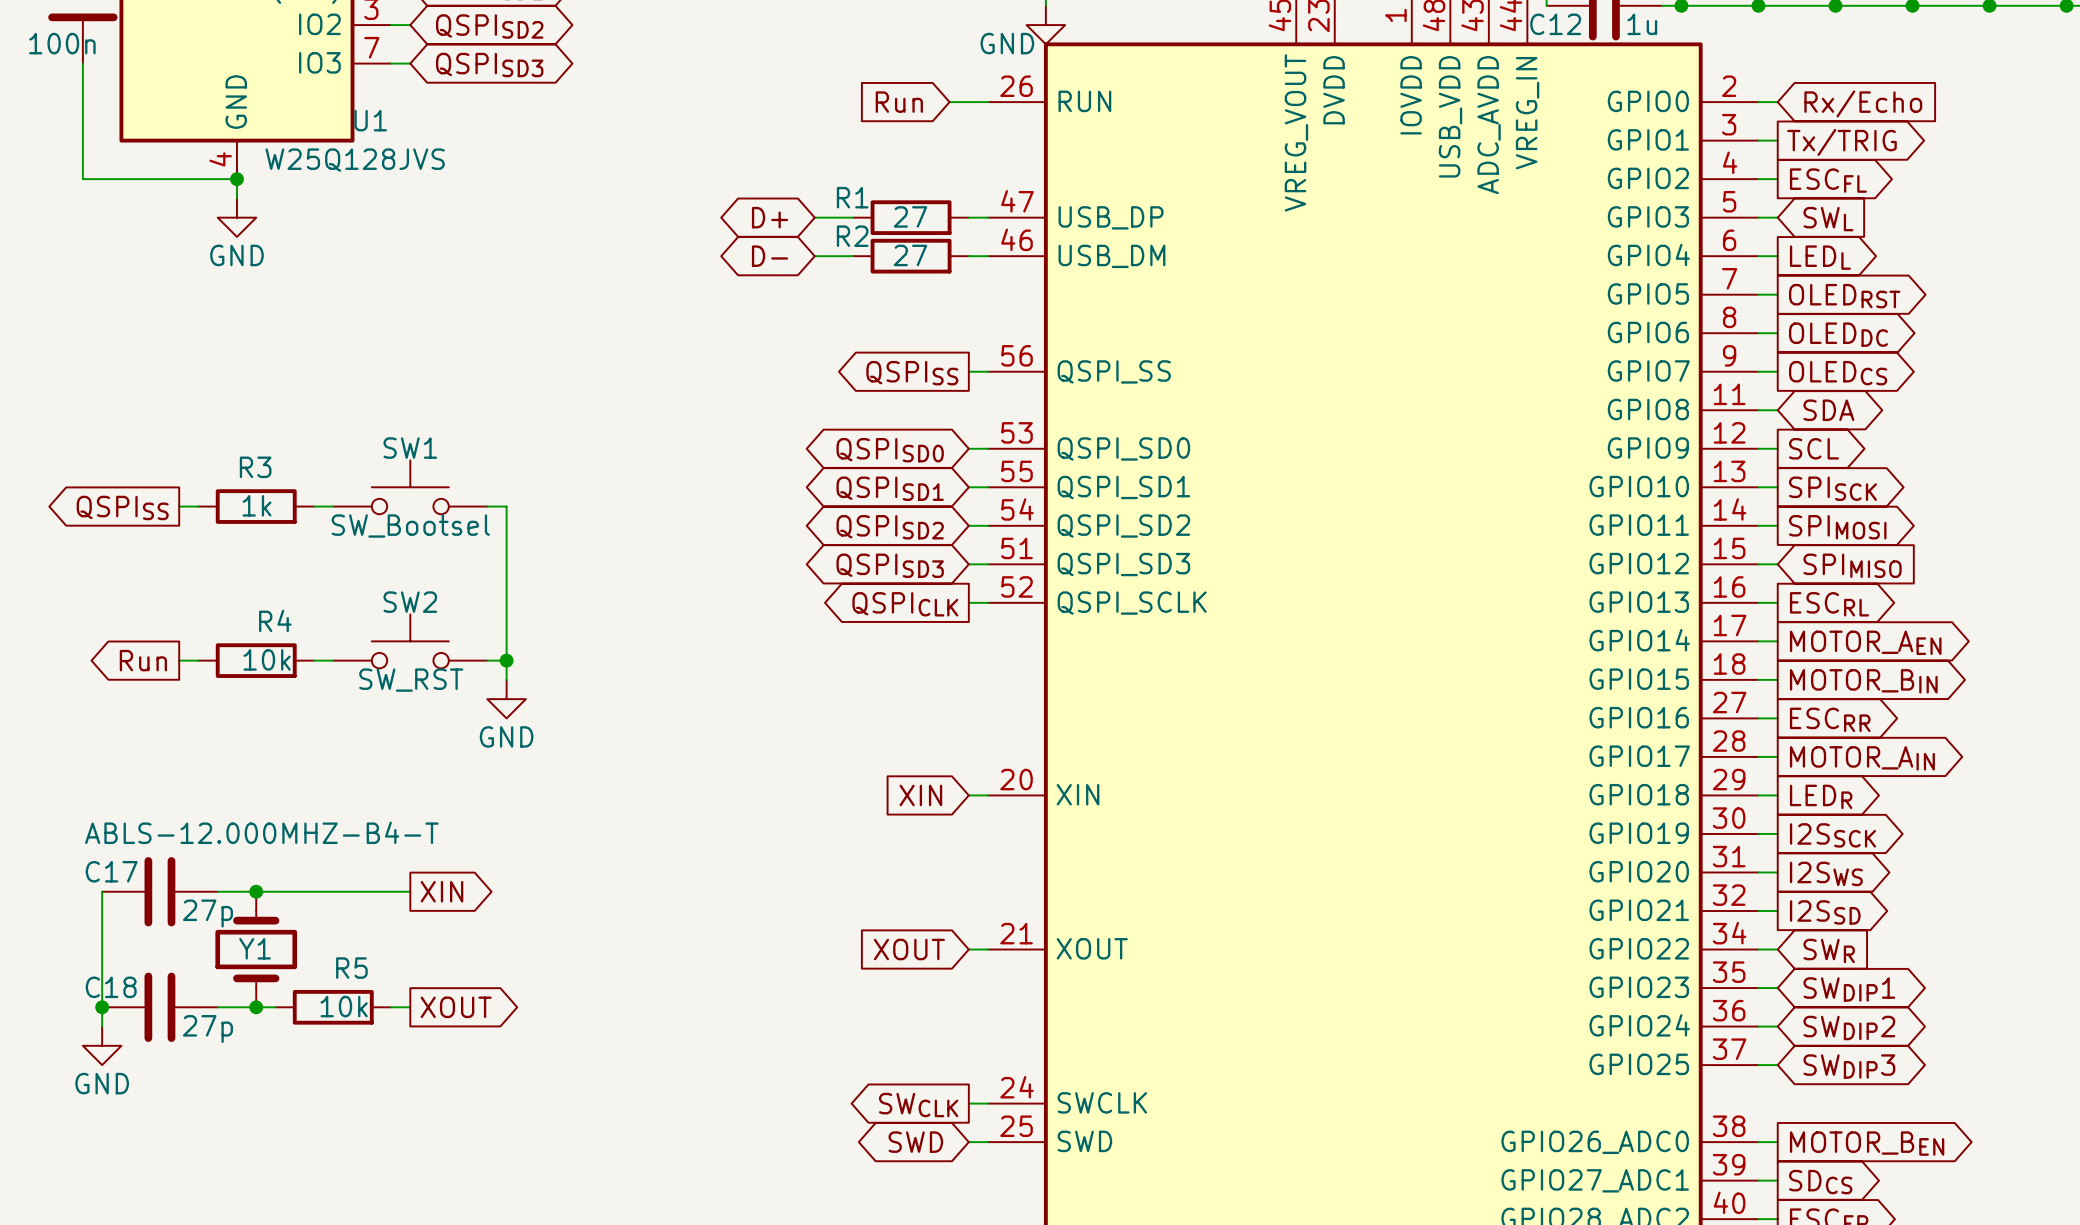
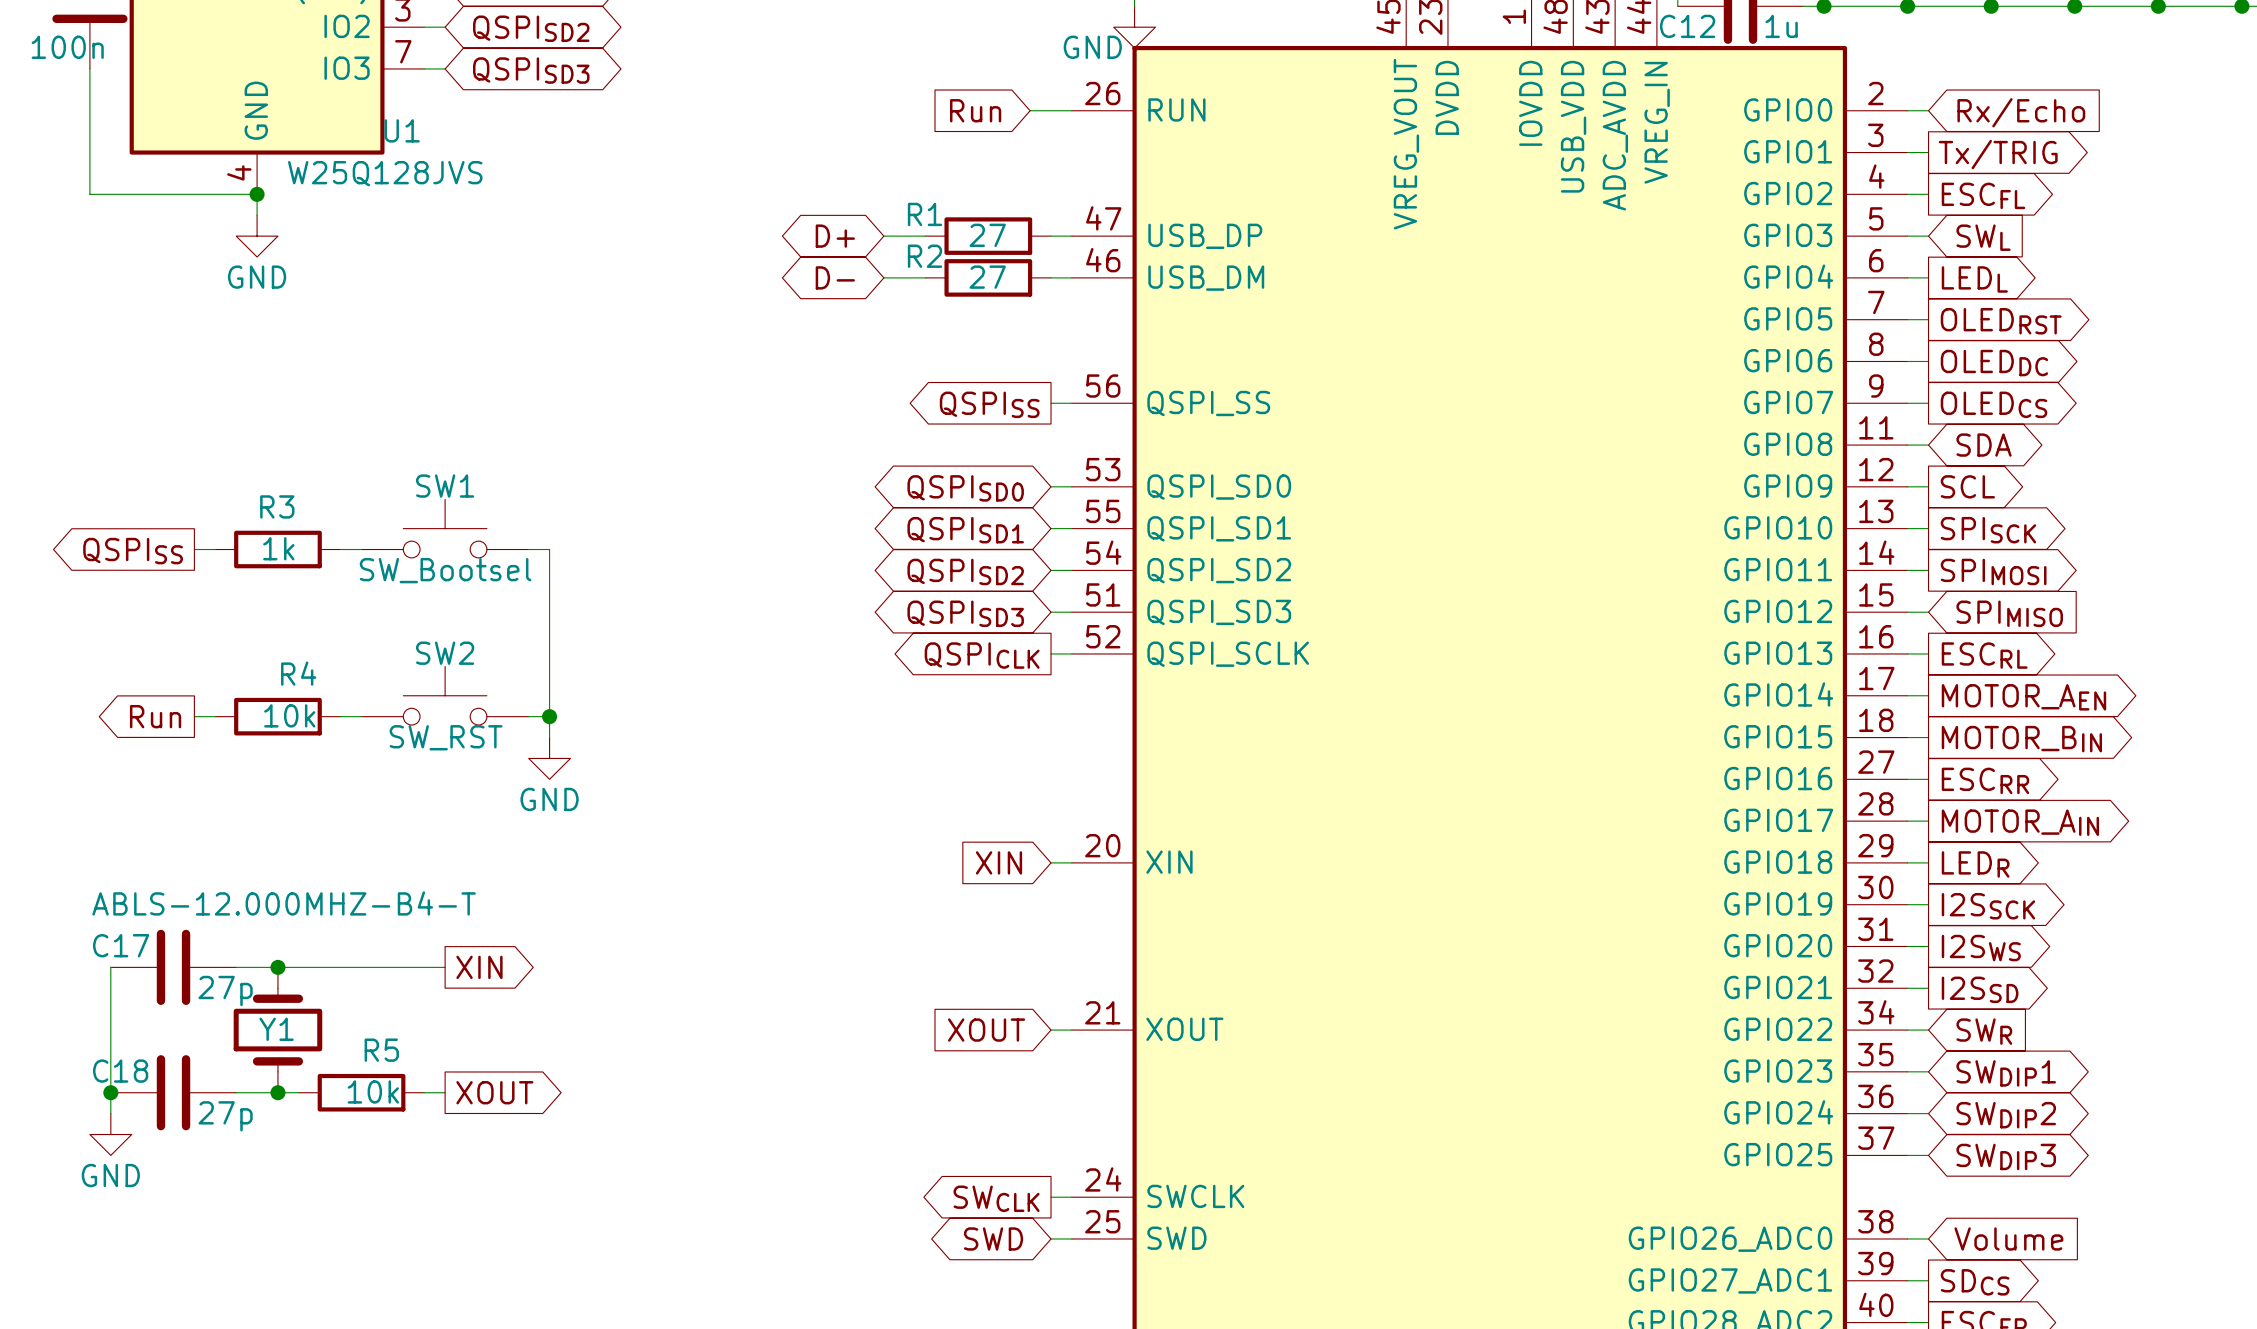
global label shape: output (1867, 1143) -> input (2008, 1238)
global label: MOTOR_BEN (1867, 1143) -> Volume (2008, 1238)

